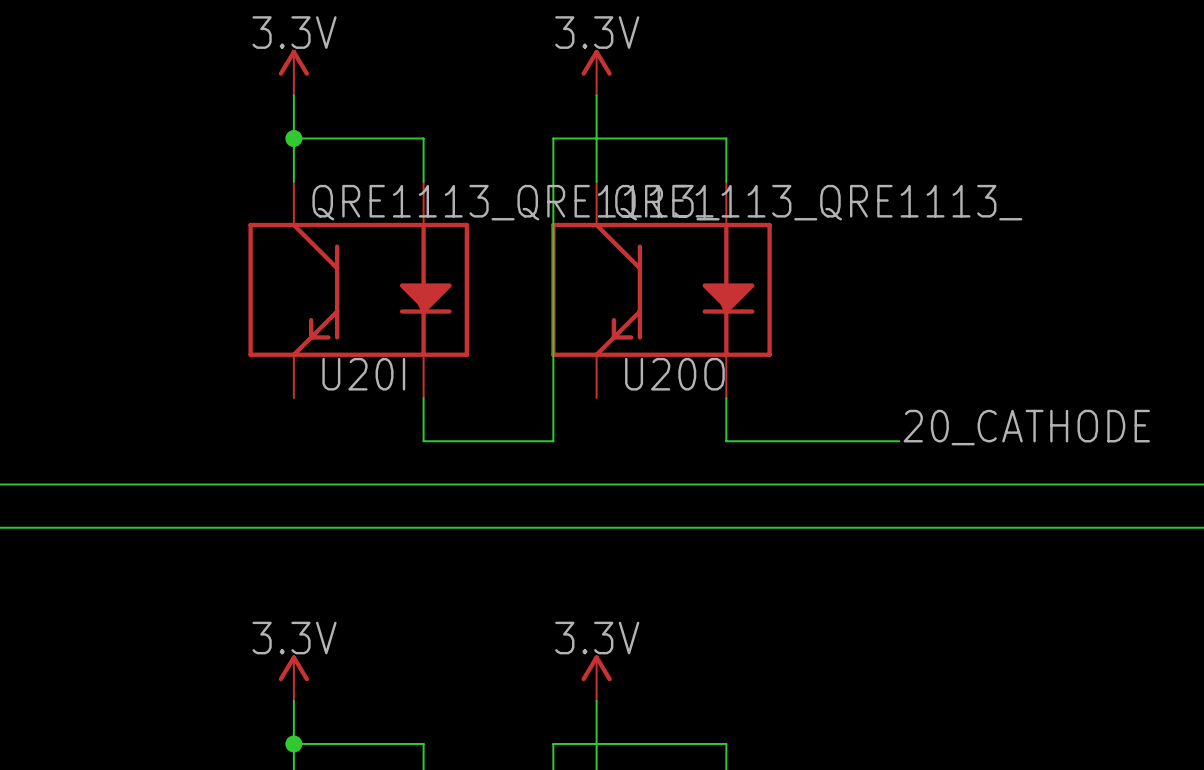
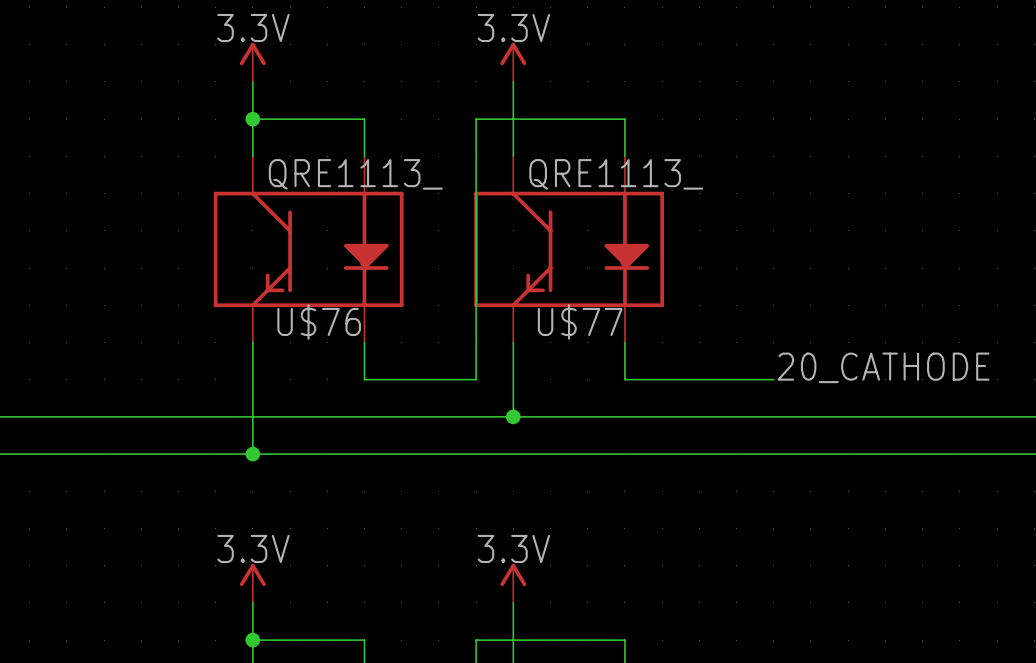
U20I value: QRE1113_QRE1113_ (516, 202) -> QRE1113_ (355, 174)
U20O value: QRE1113_QRE1113_ (818, 202) -> QRE1113_ (616, 174)
U20I name: U20I (363, 374) -> U$76 (319, 321)
U20O name: U20O (674, 374) -> U$77 (580, 321)
wire: none -> (252, 342) (252, 454)
wire: none -> (513, 342) (513, 416)
junction: none -> (513, 416)
junction: none -> (252, 454)

